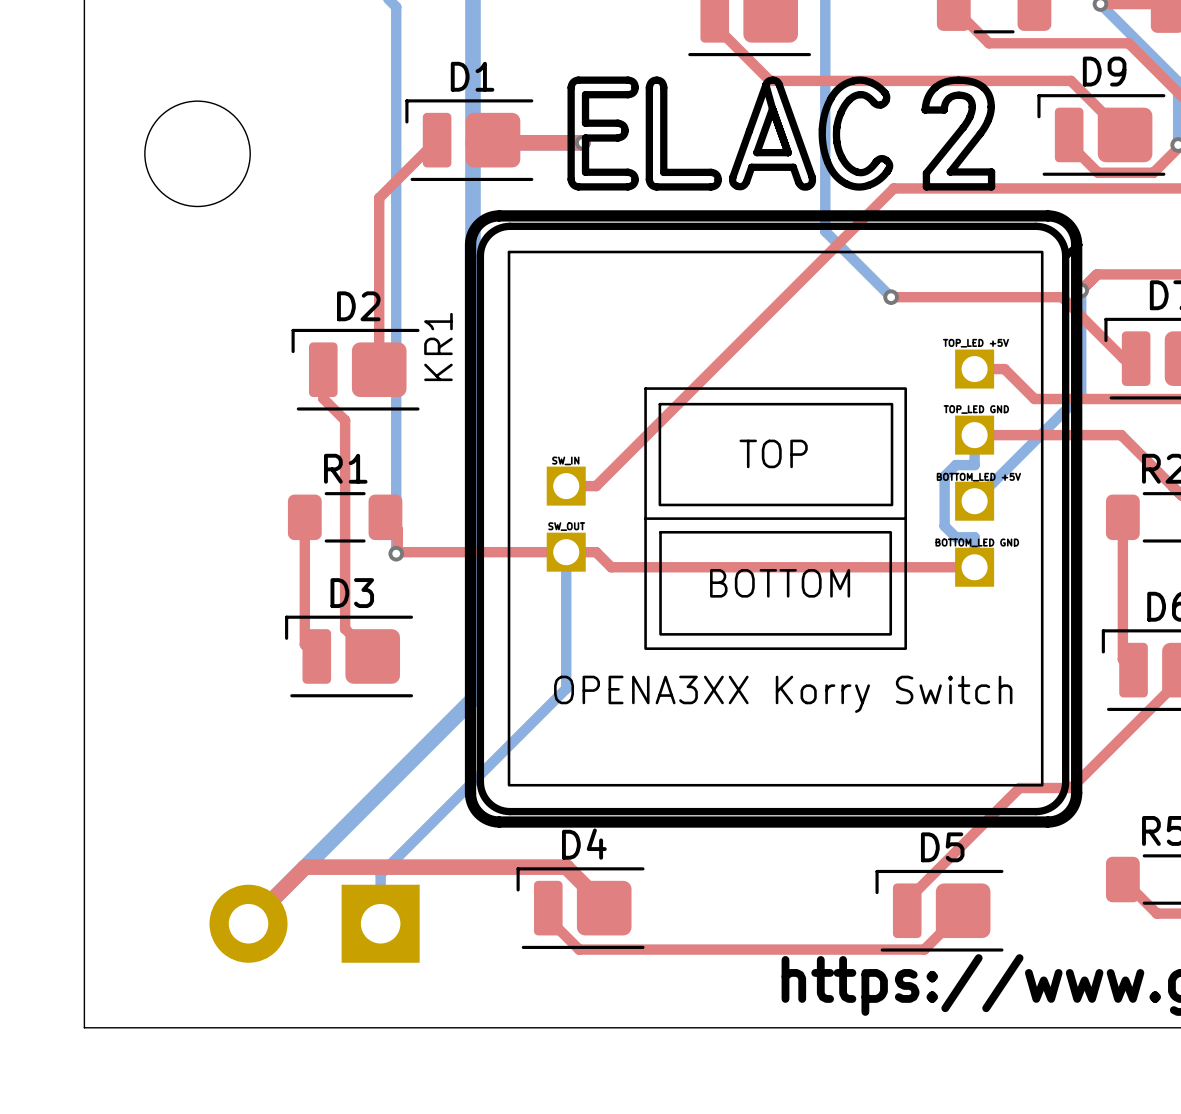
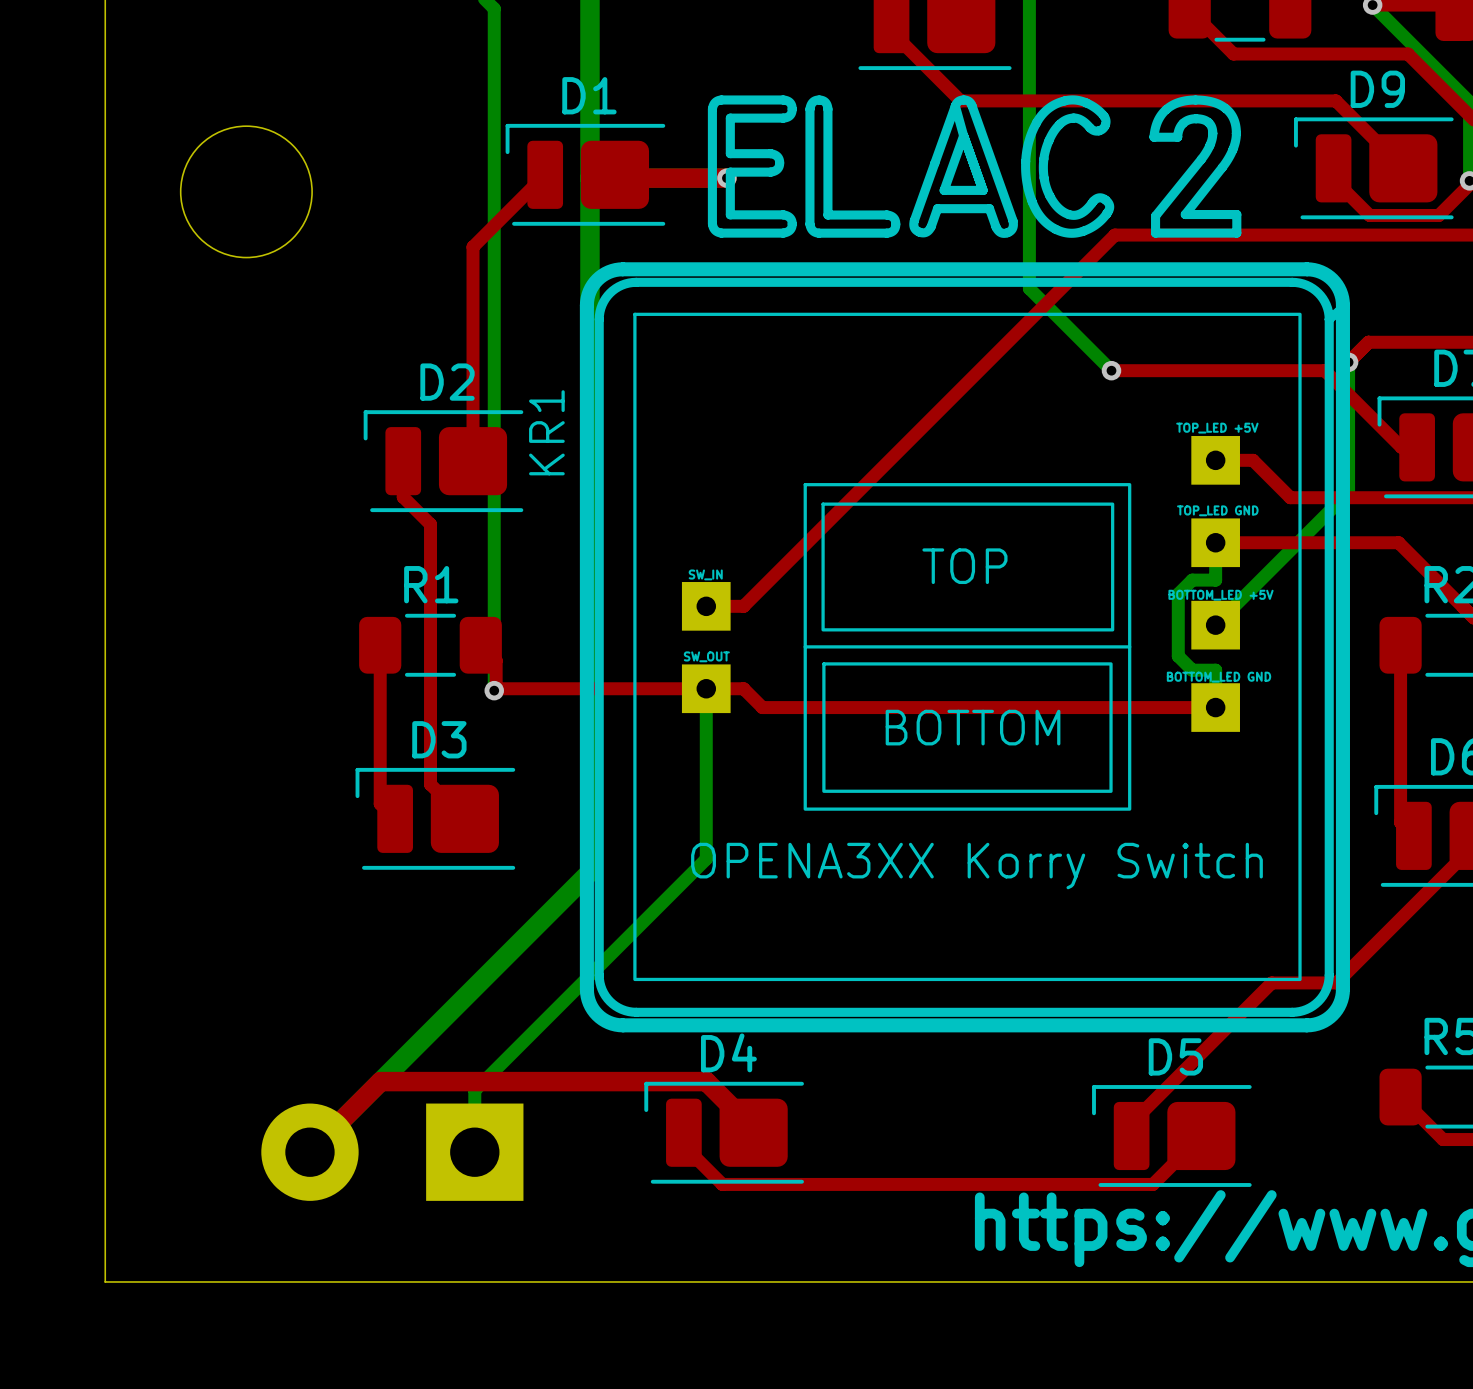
KR1 footprint: [507, 250, 1044, 787] -> [633, 312, 1302, 982]

